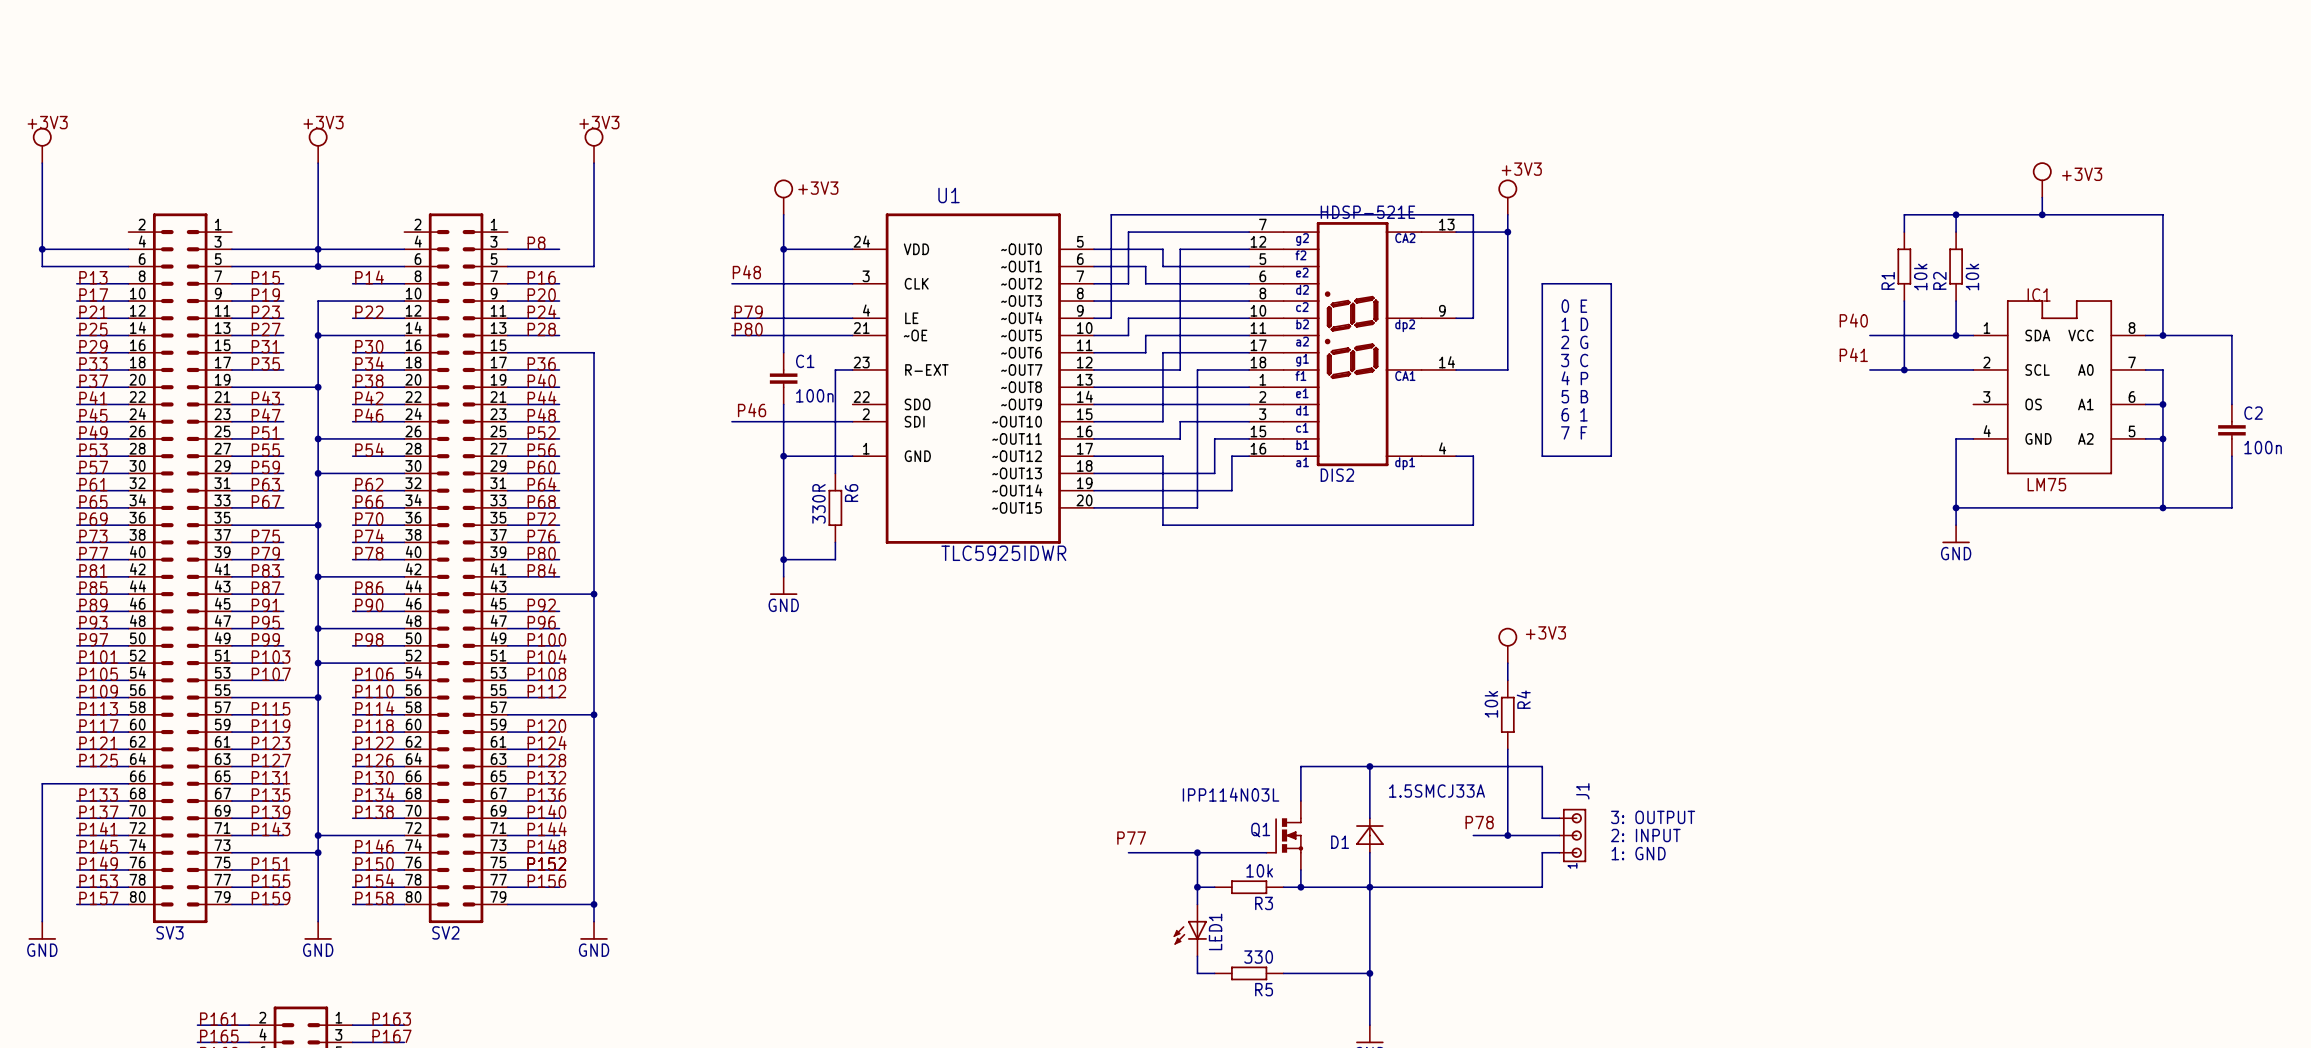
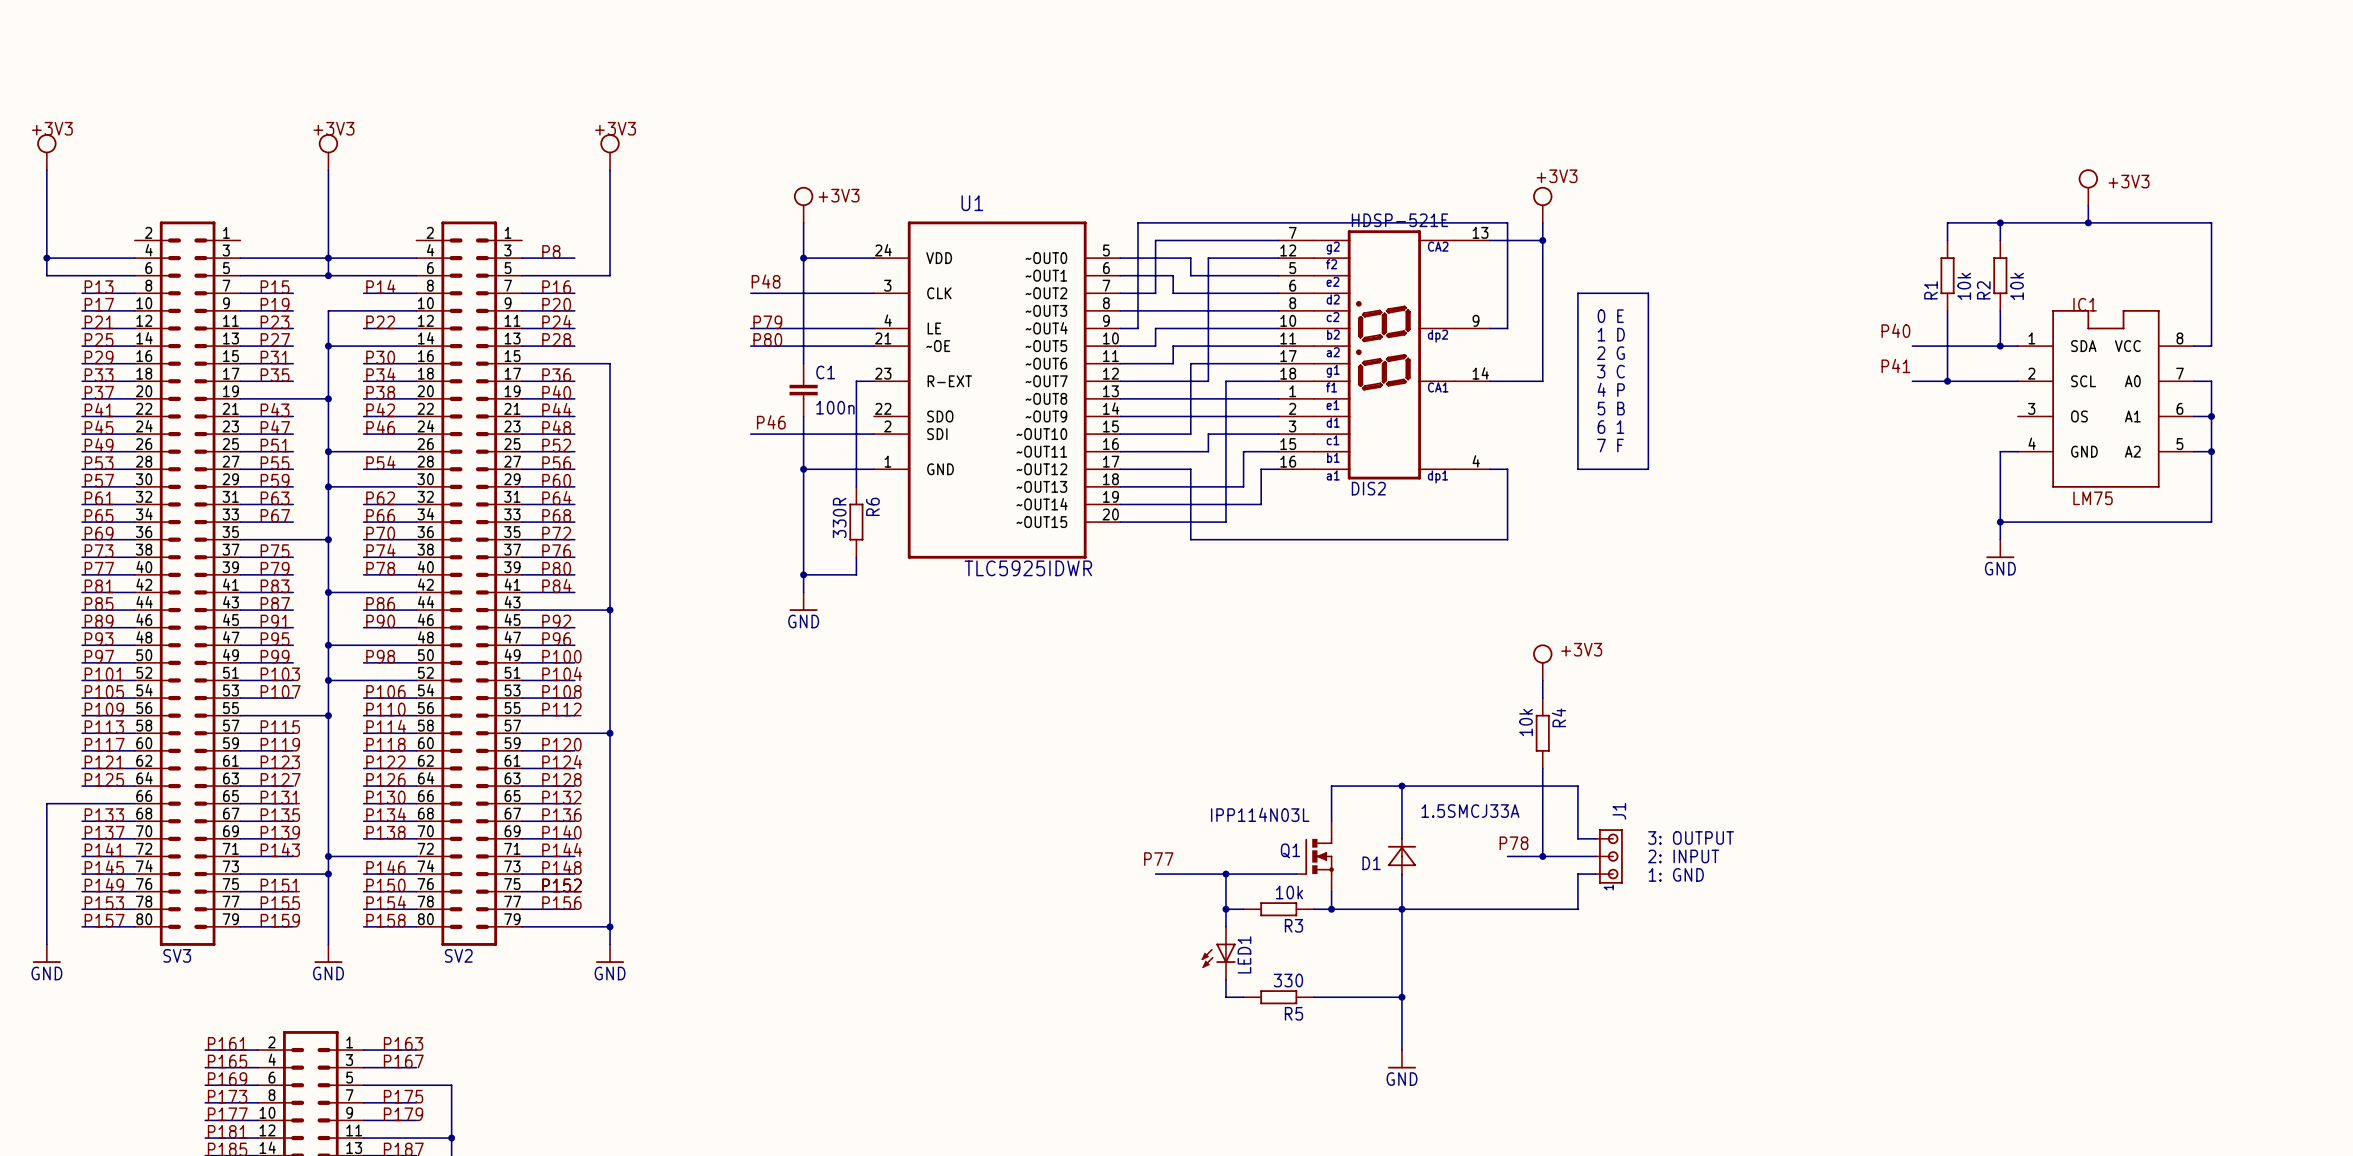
wire: (2162, 335) (2231, 335) (2231, 404) -> none
junction: (2162, 335) -> none
C2: 100n (2231, 430) -> none
wire: (2231, 456) (2231, 507) (2162, 507) -> none
junction: (2162, 507) -> none

